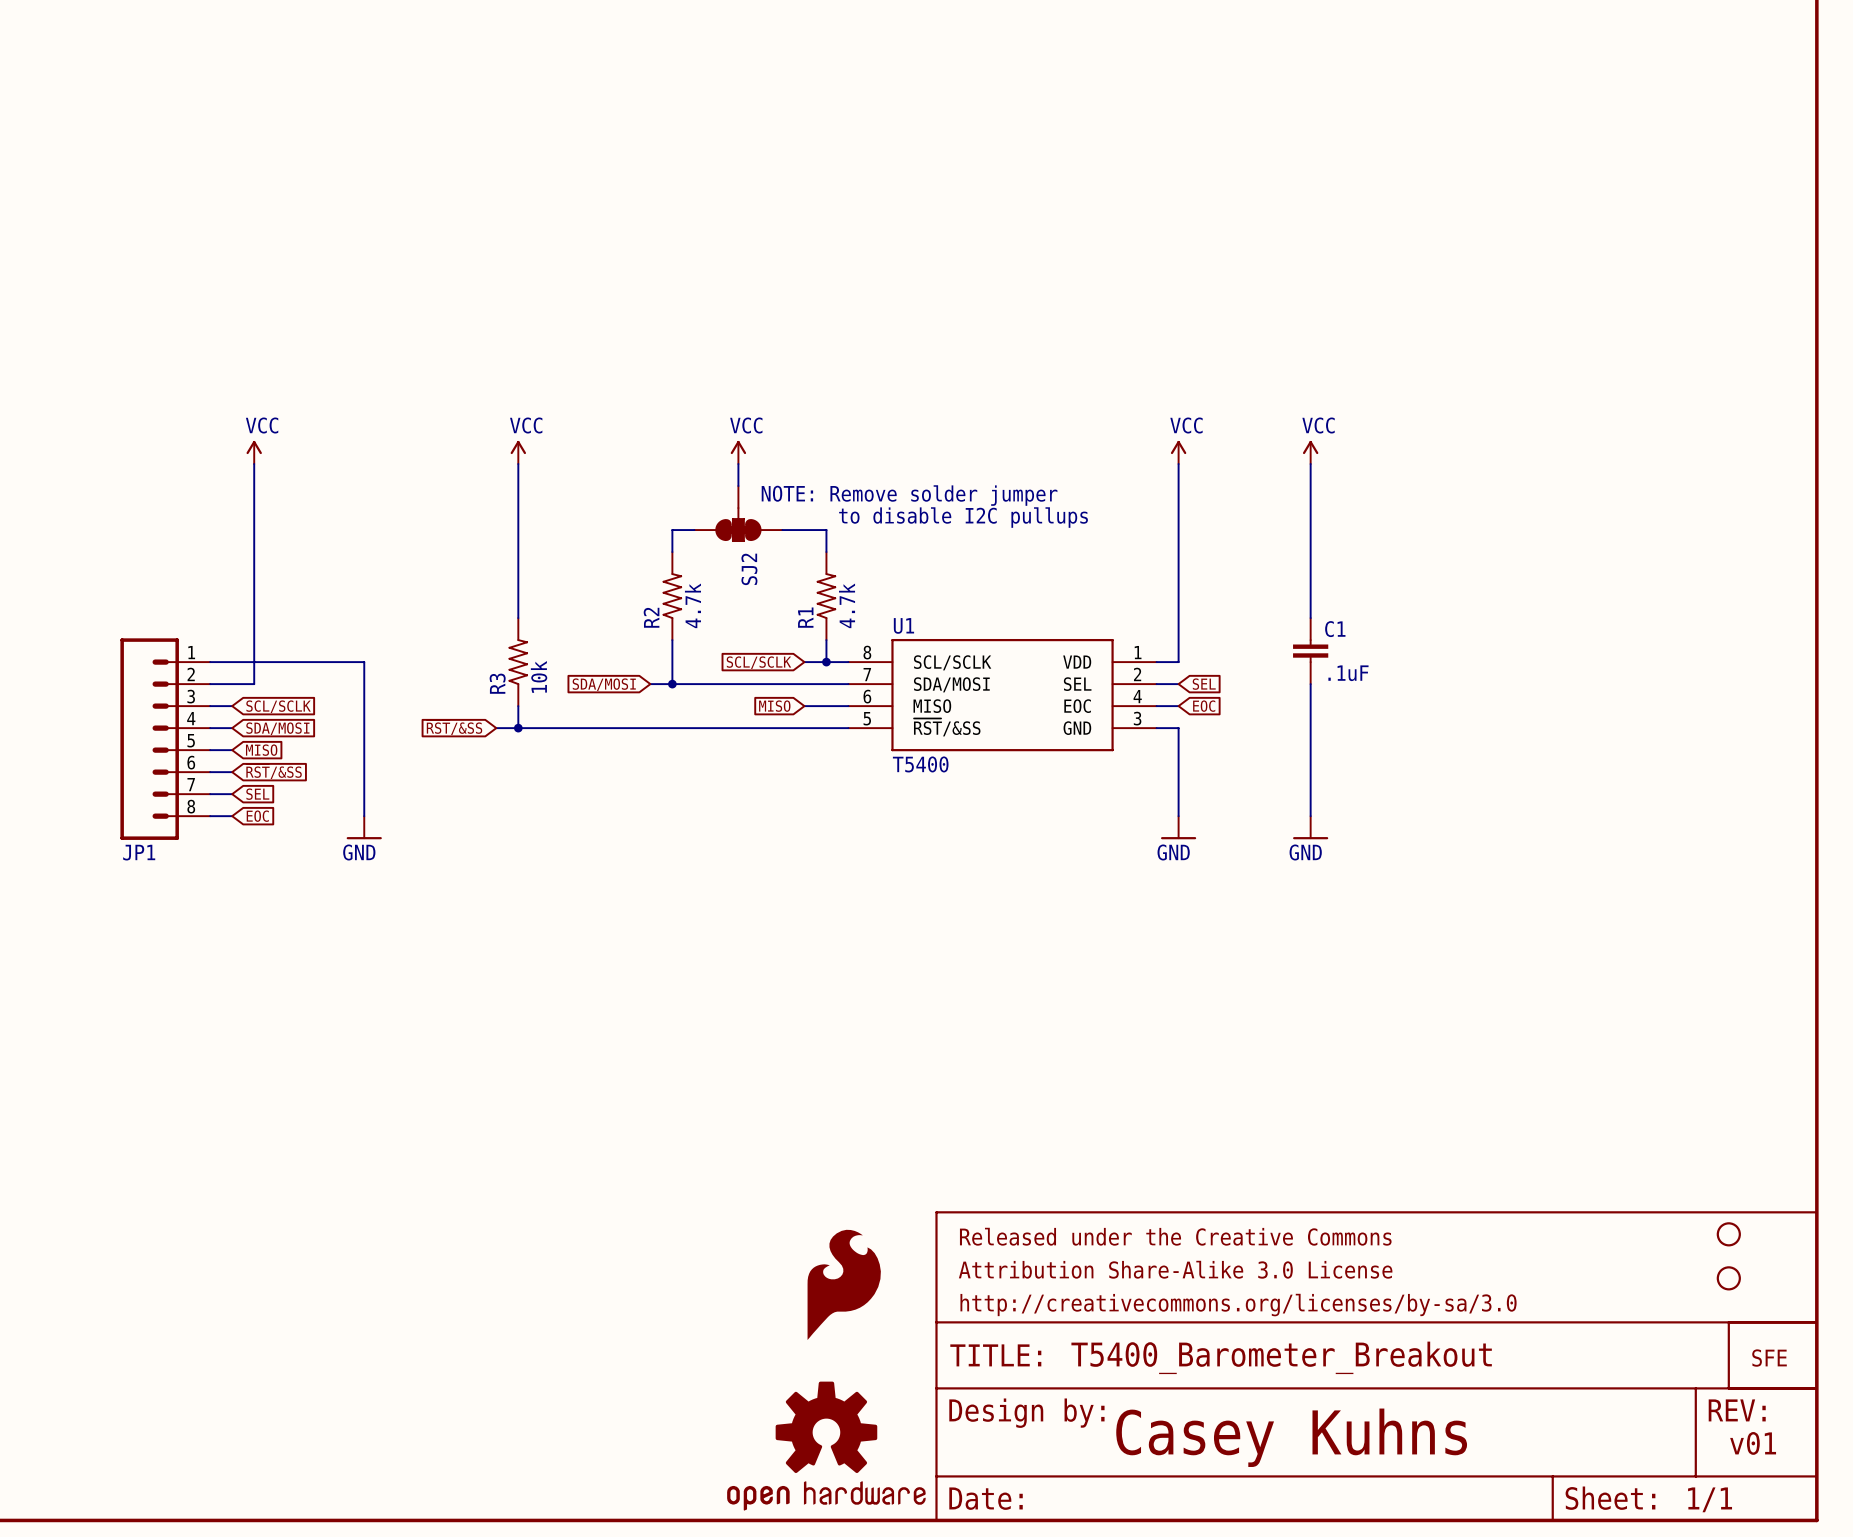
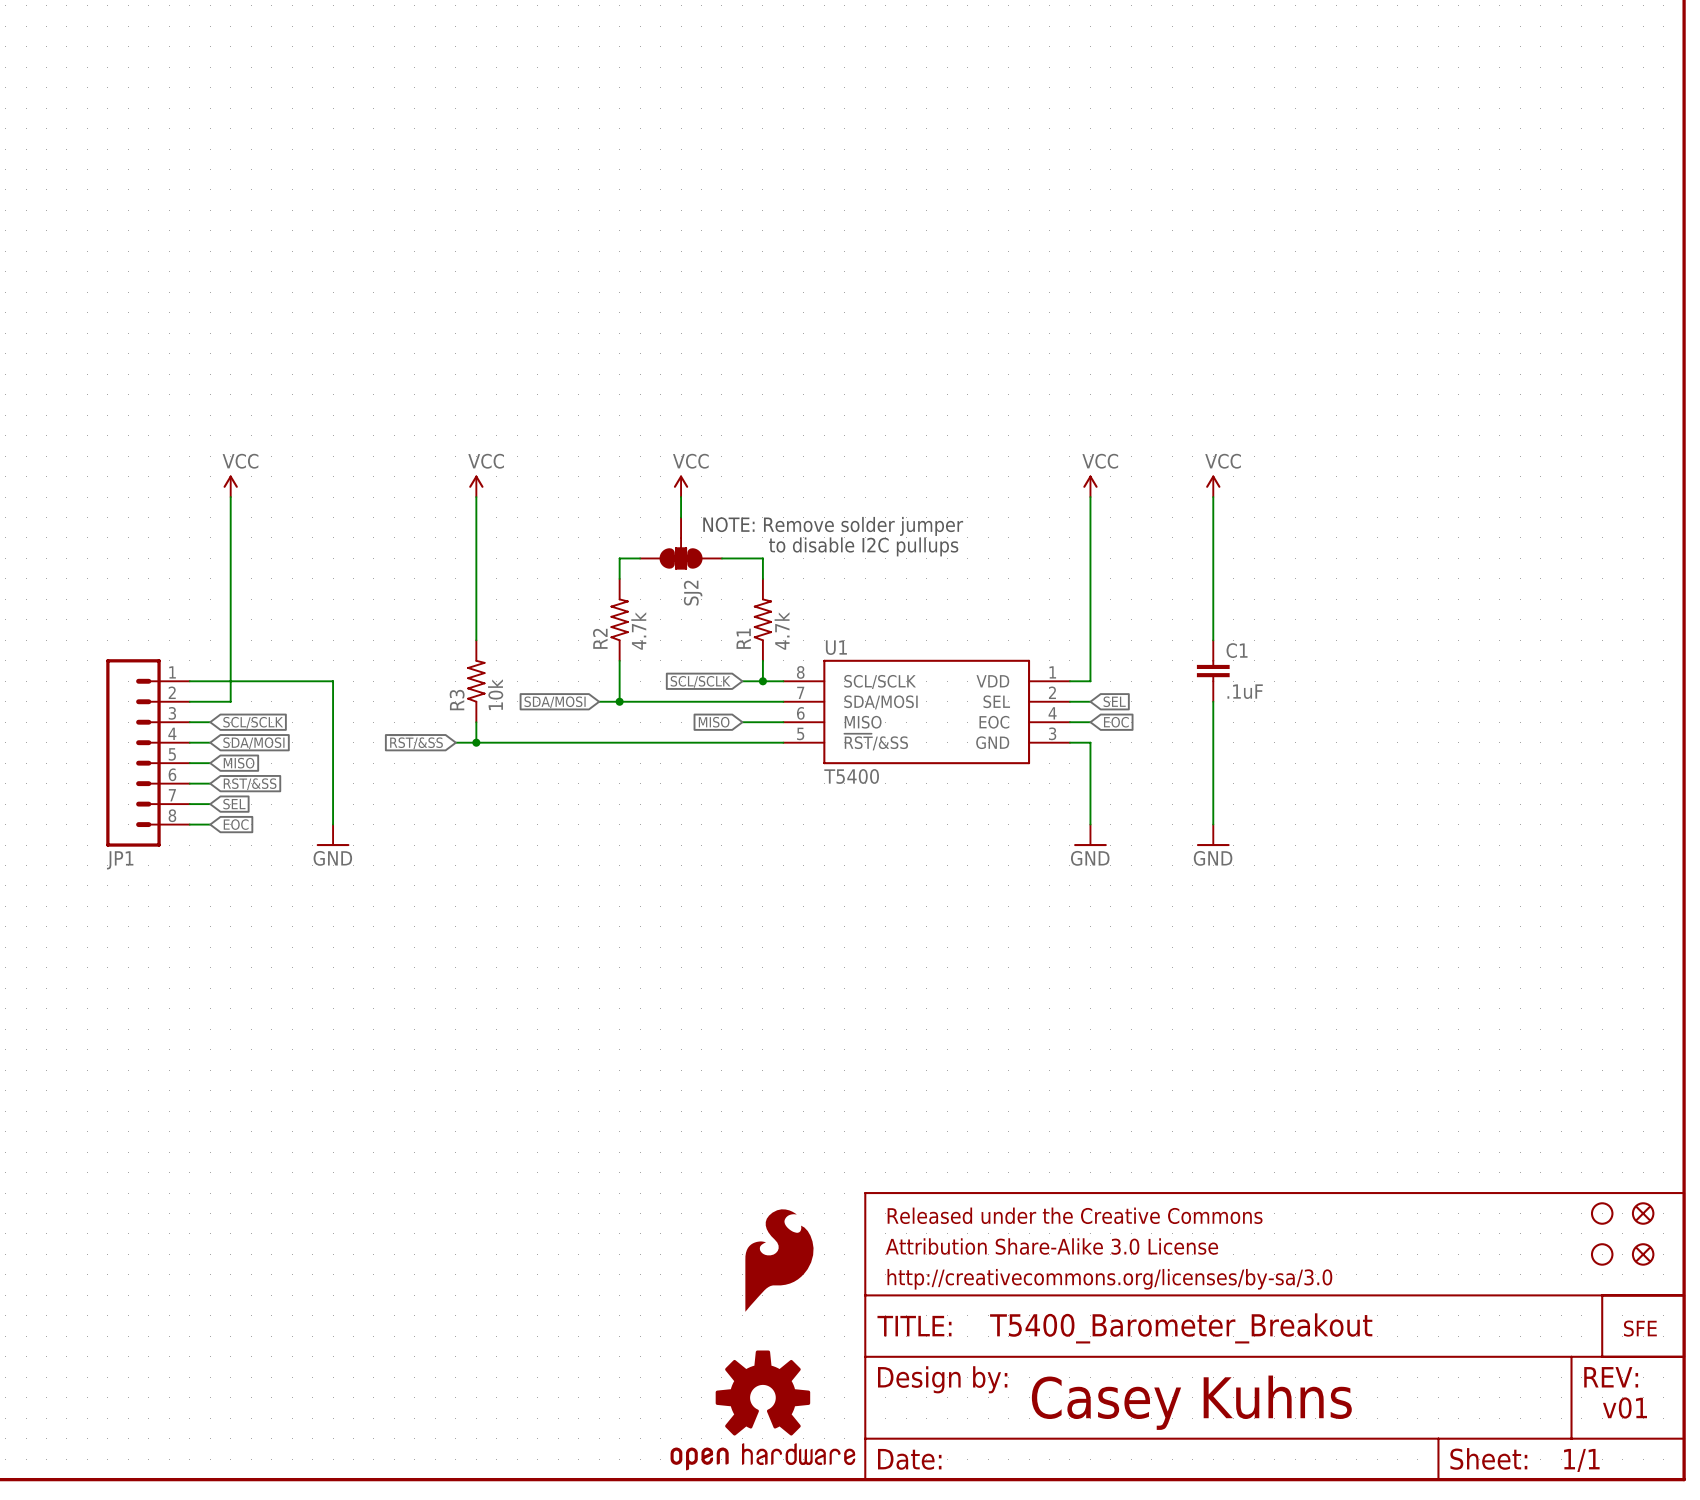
part: none -> (1643, 1213)
part: none -> (1643, 1254)

